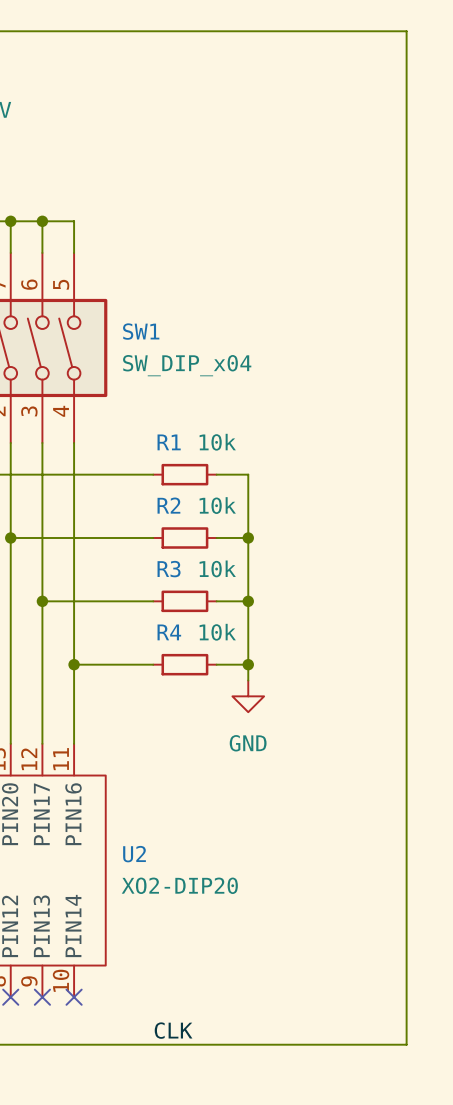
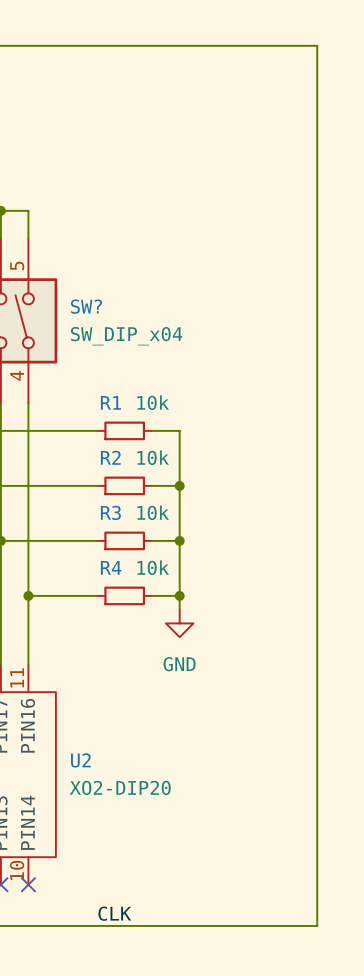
SW1 name: SW1 (141, 331) -> SW? (86, 306)

